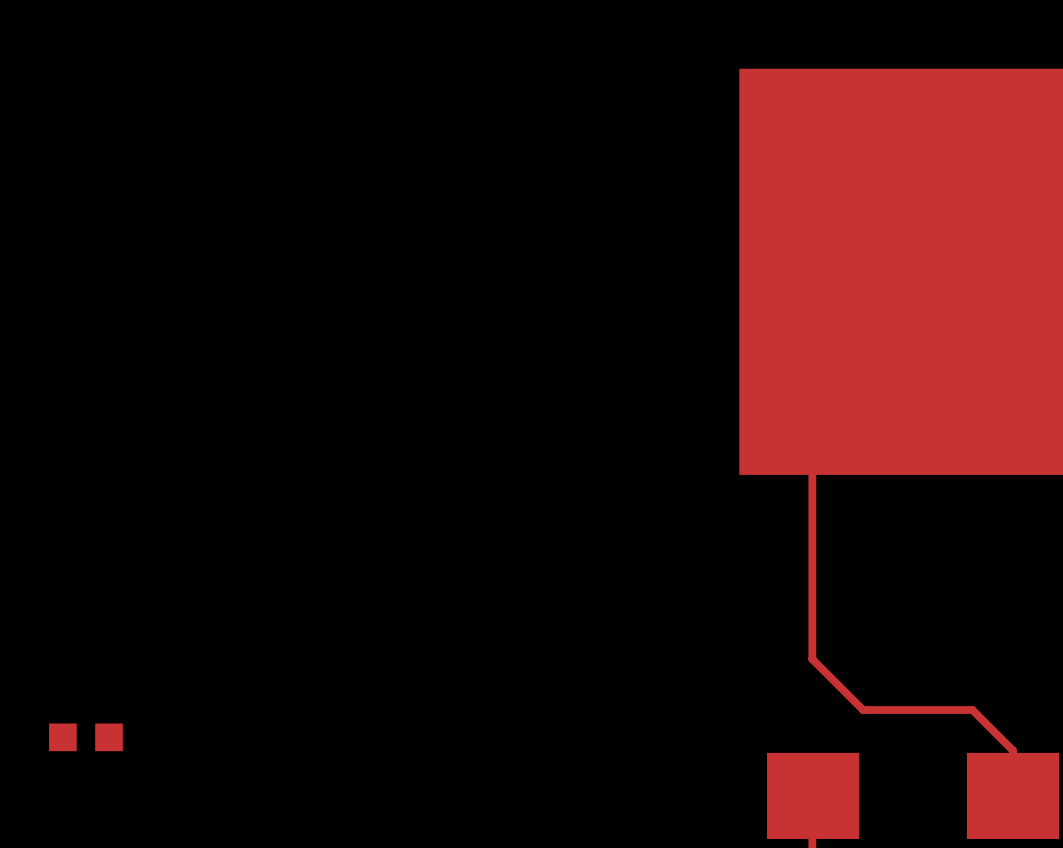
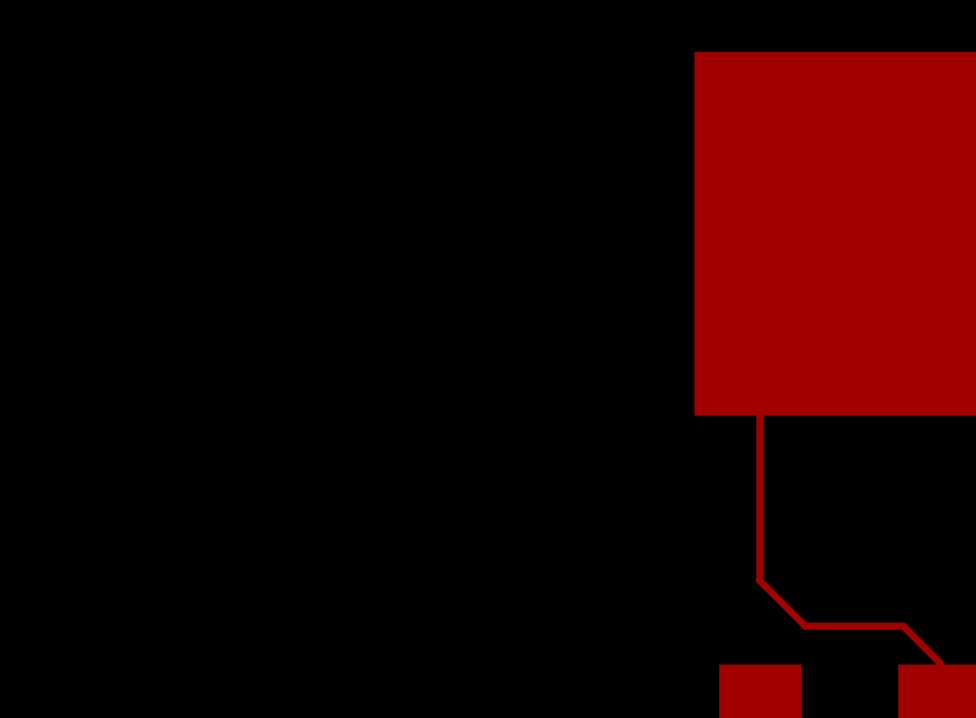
part: (85, 737) -> none

